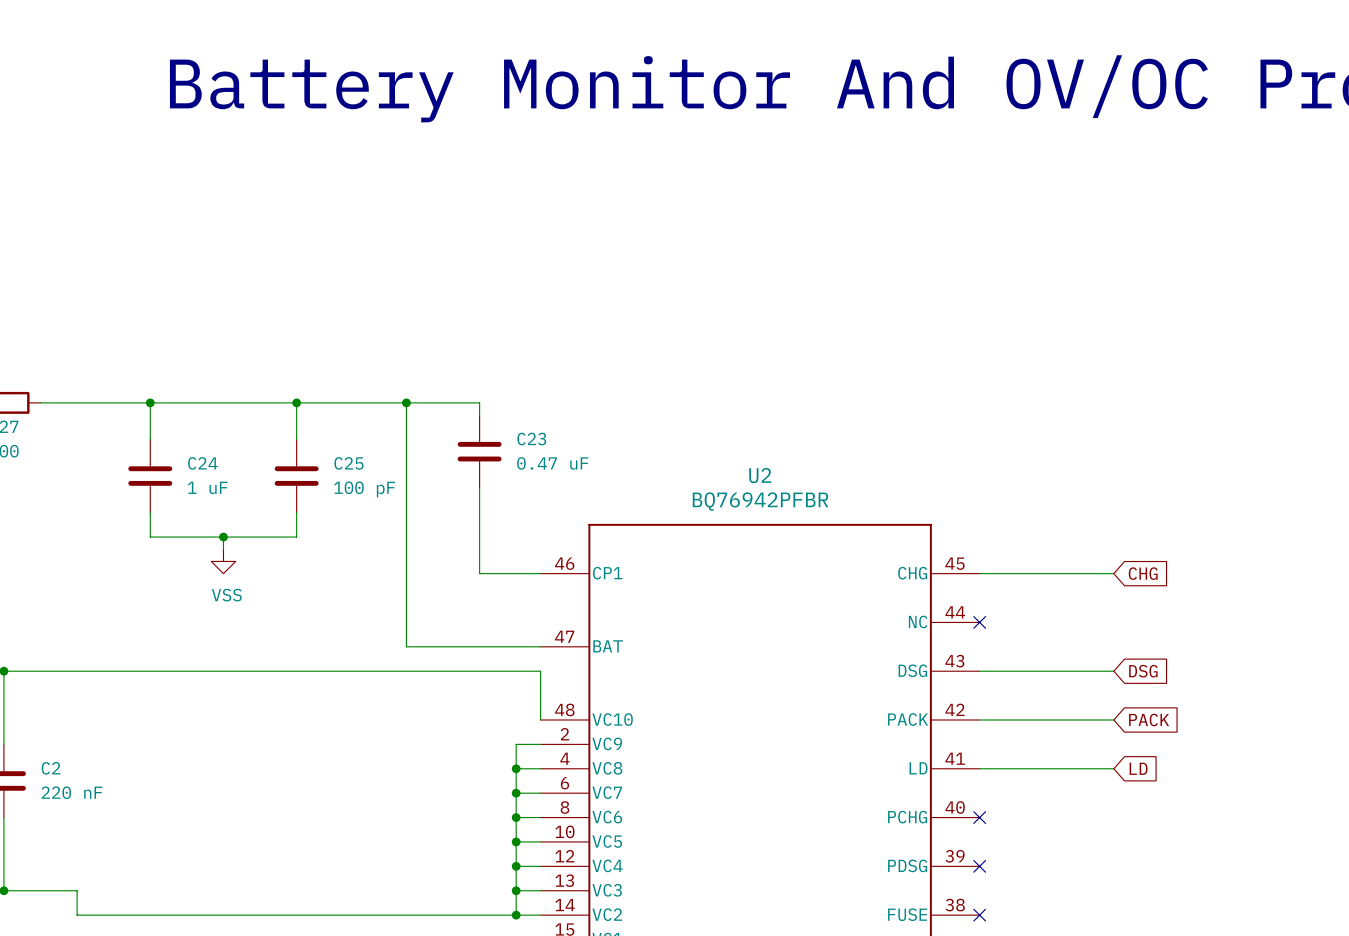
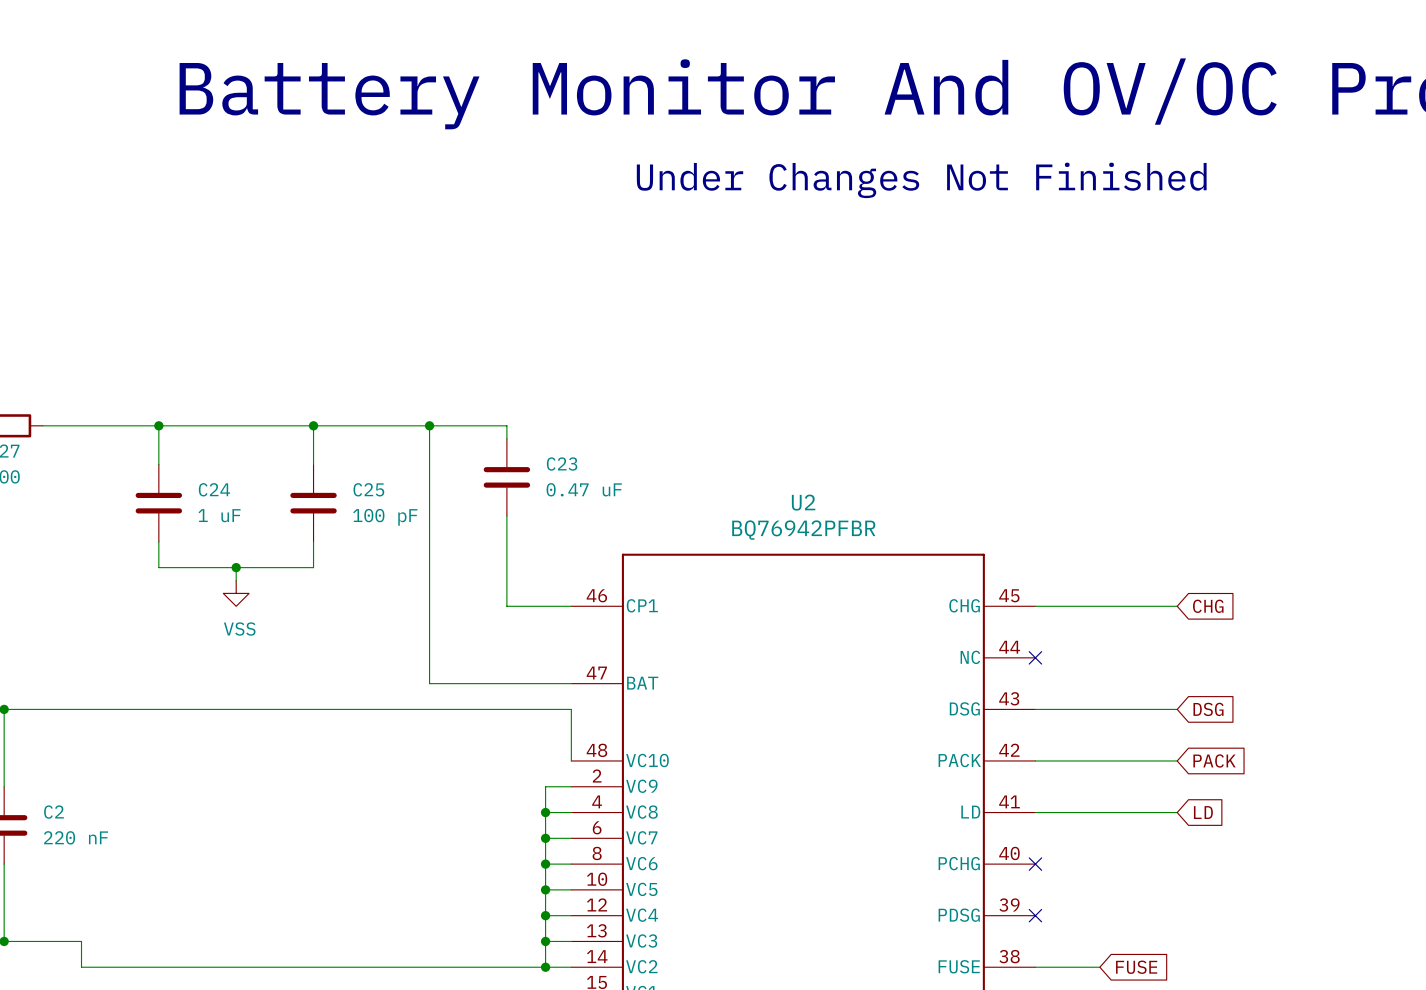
text: none -> Under Changes Not Finished (921, 180)
wire: none -> (1035, 967) (1099, 967)
no-connect mark: (979, 915) -> none
global label: none -> FUSE (1136, 967)

